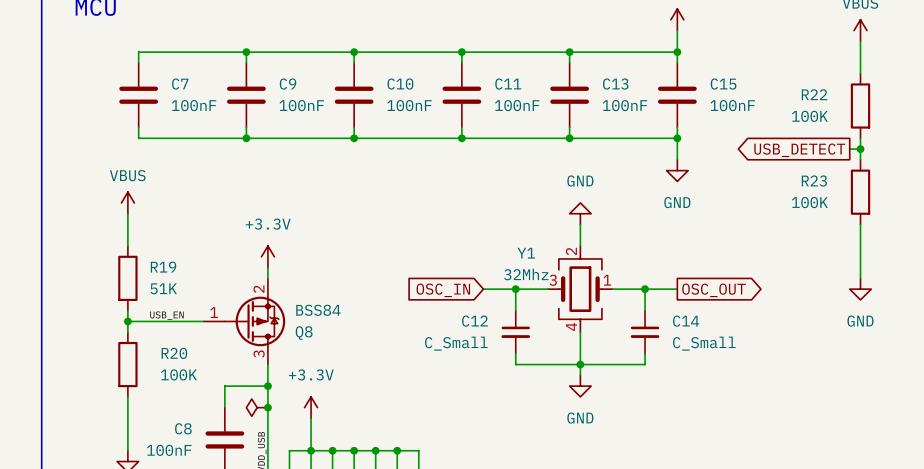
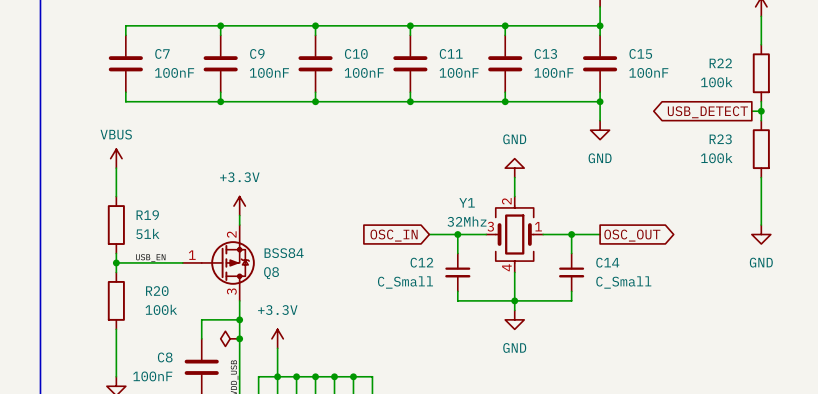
R22 value: 100K (809, 116) -> 100k (716, 82)
R23 value: 100K (809, 202) -> 100k (716, 158)
R19 value: 51K (163, 288) -> 51k (147, 233)
R20 value: 100K (178, 374) -> 100k (161, 309)

